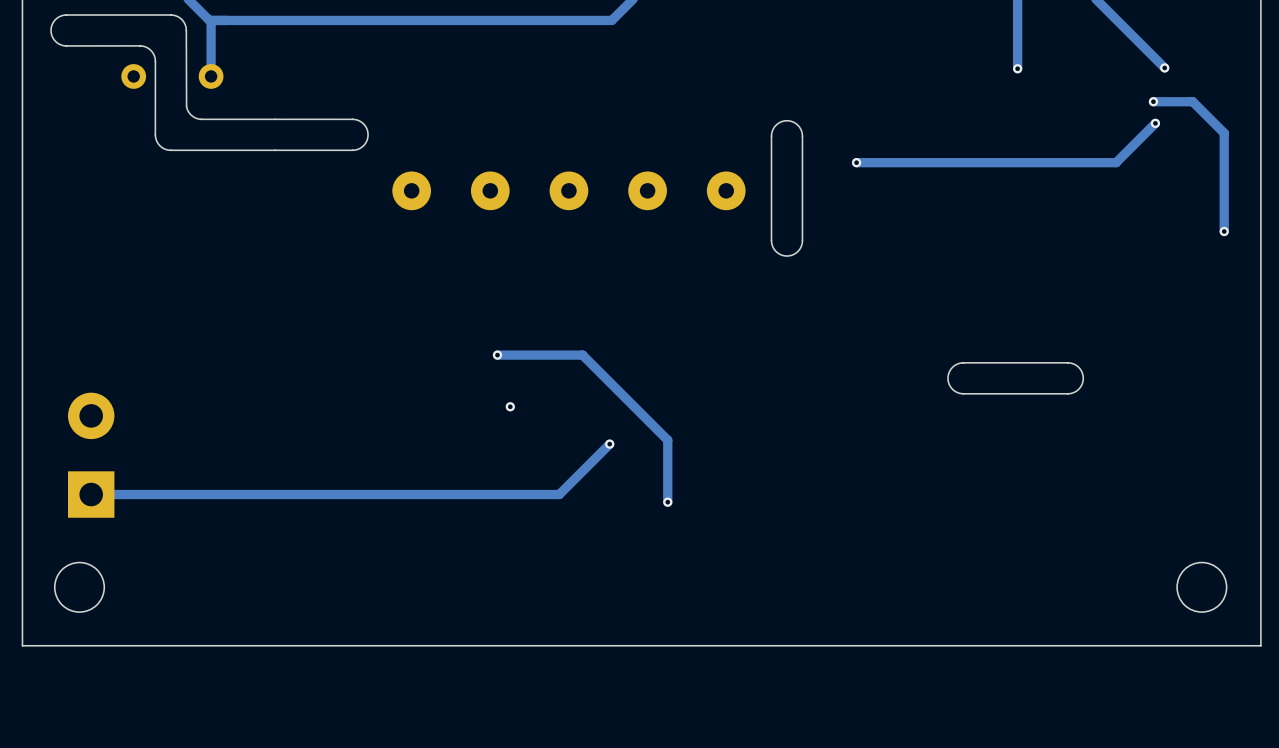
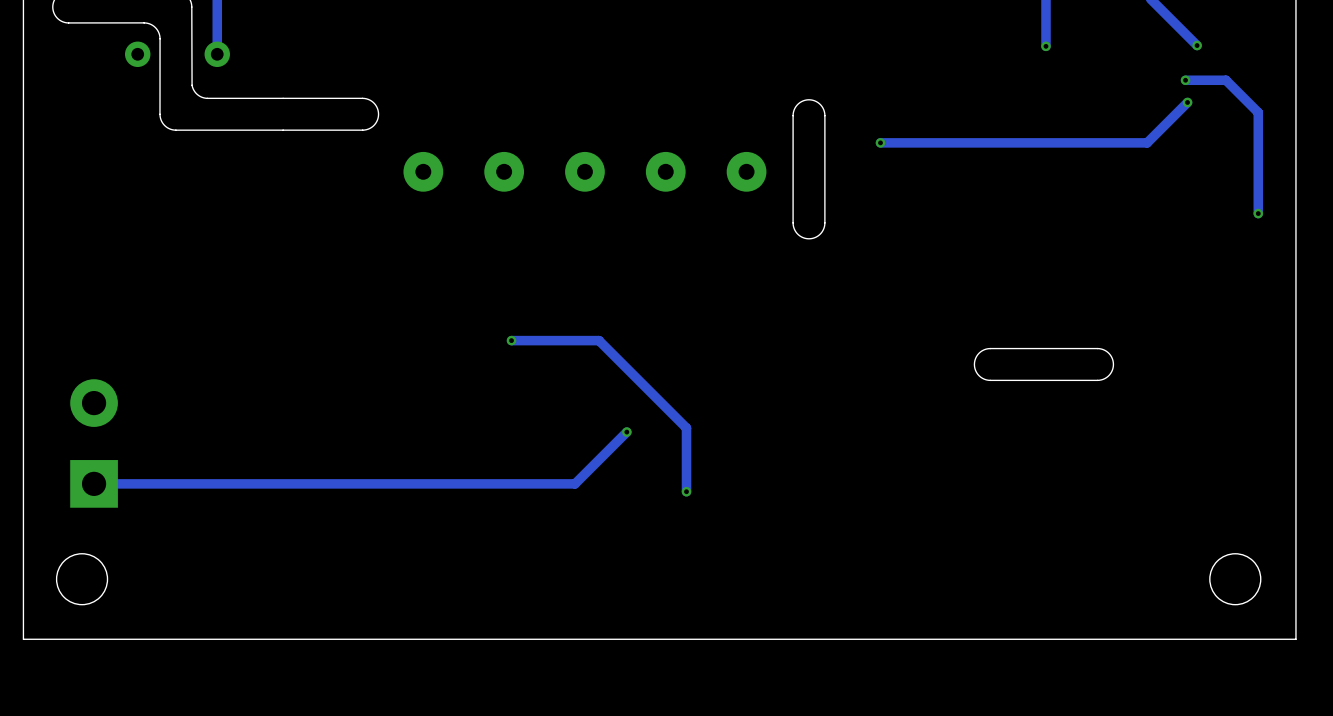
via: (510, 406) -> none

